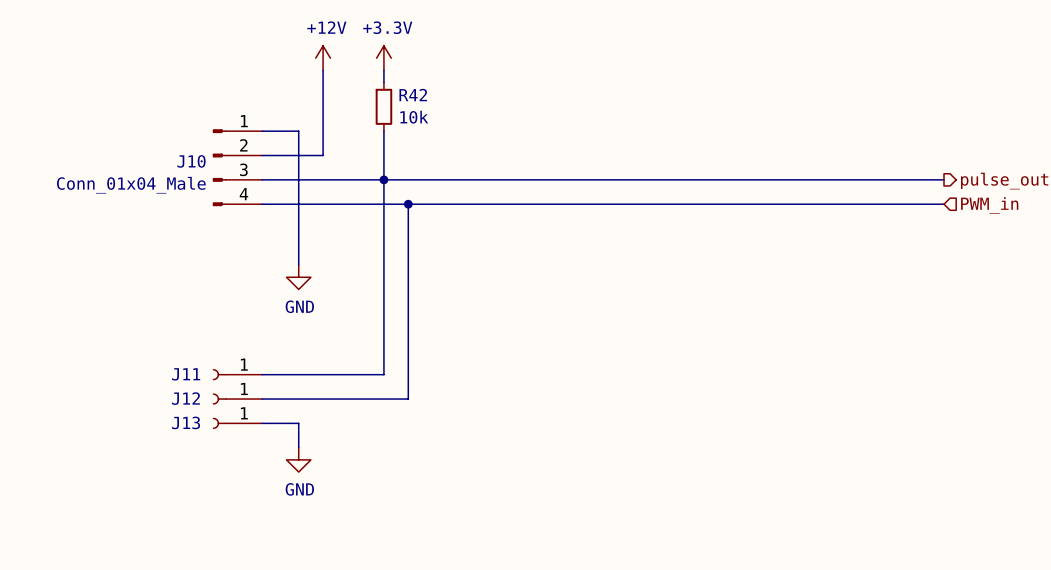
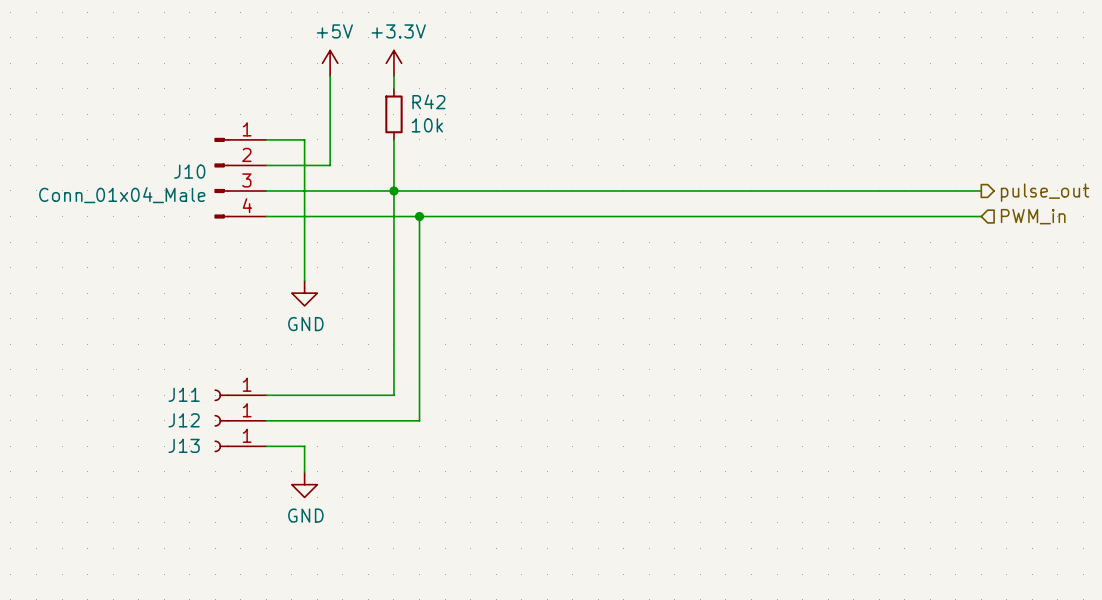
power symbol: +12V (323, 58) -> +5V (330, 63)

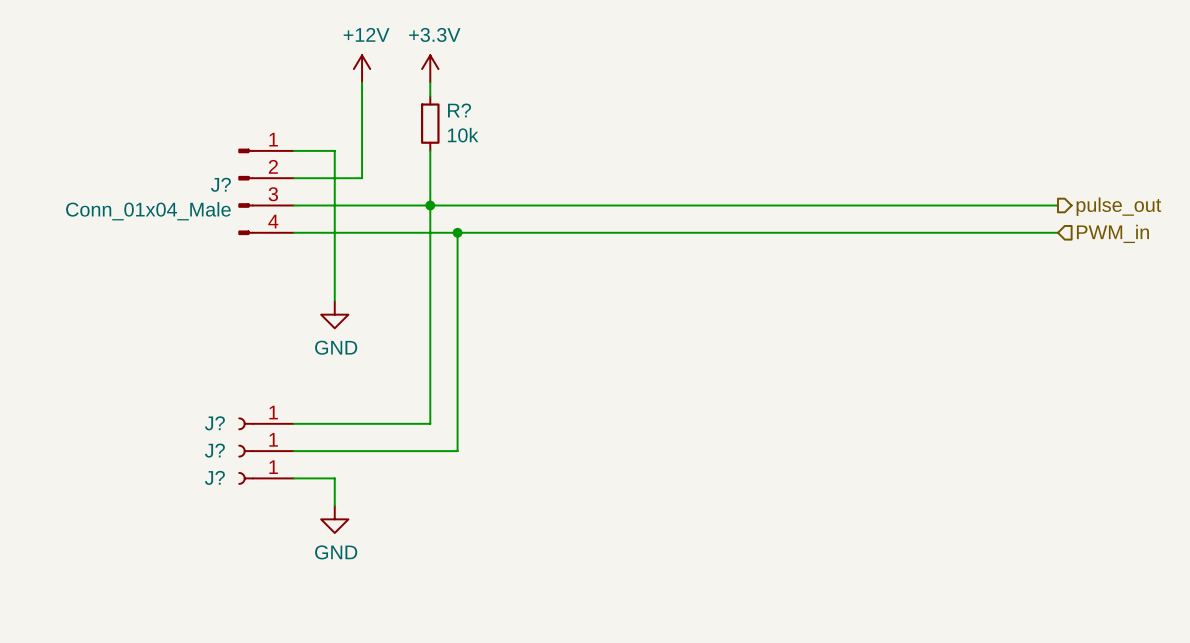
power symbol: +5V (330, 63) -> +12V (362, 69)
R42 name: R42 (428, 101) -> R? (459, 110)
J10 name: J10 (189, 171) -> J? (220, 184)
J11 name: J11 (184, 394) -> J? (214, 423)
J12 name: J12 (184, 420) -> J? (214, 450)
J13 name: J13 (184, 445) -> J? (214, 477)

